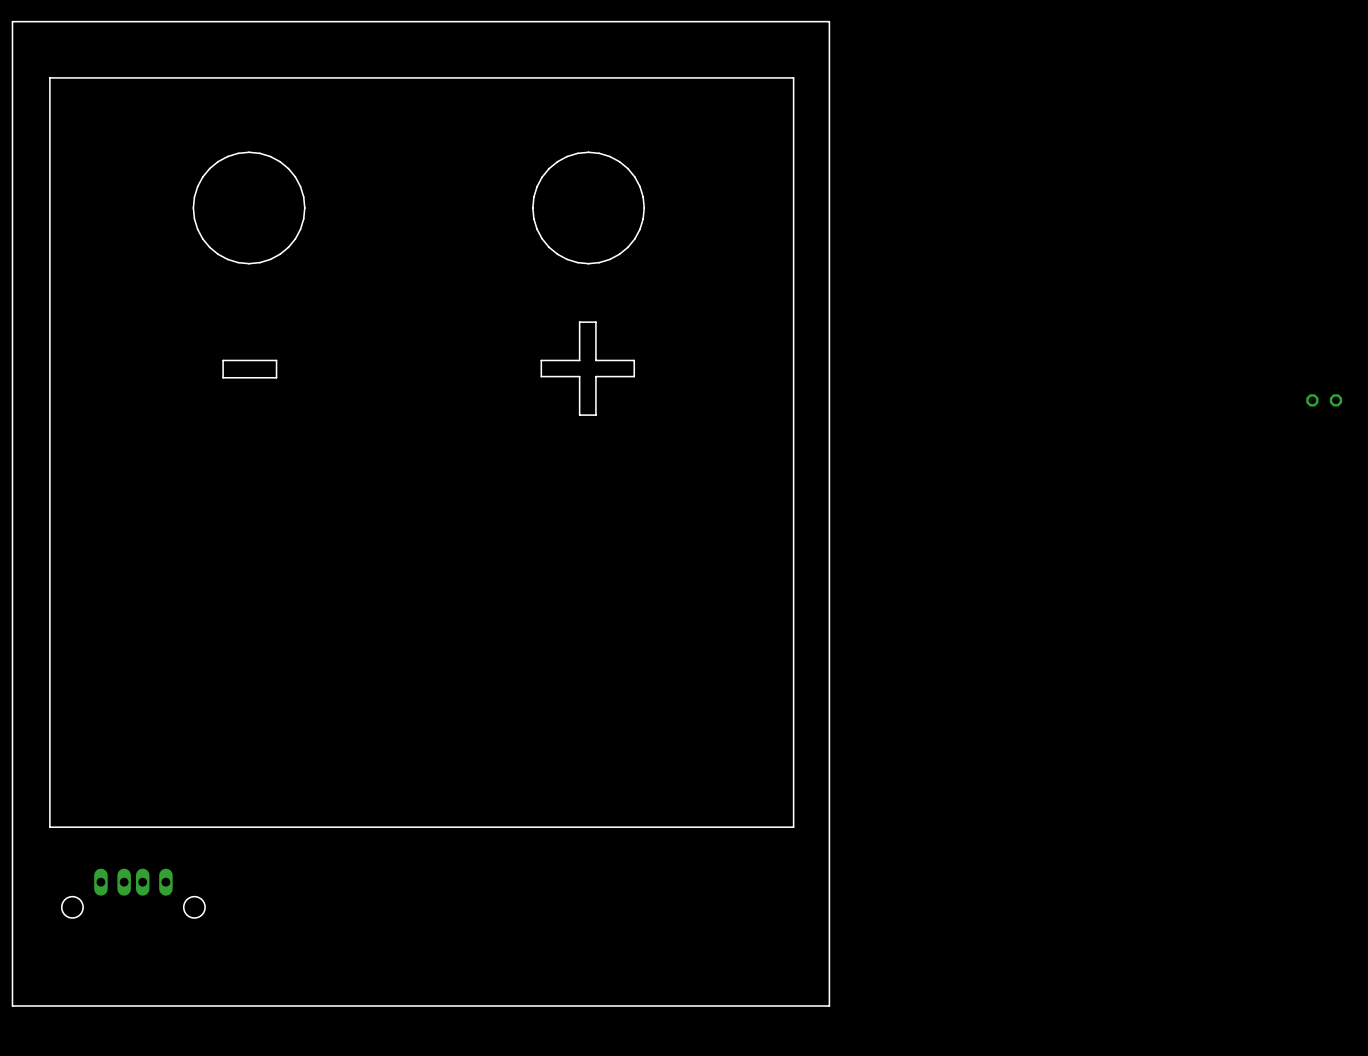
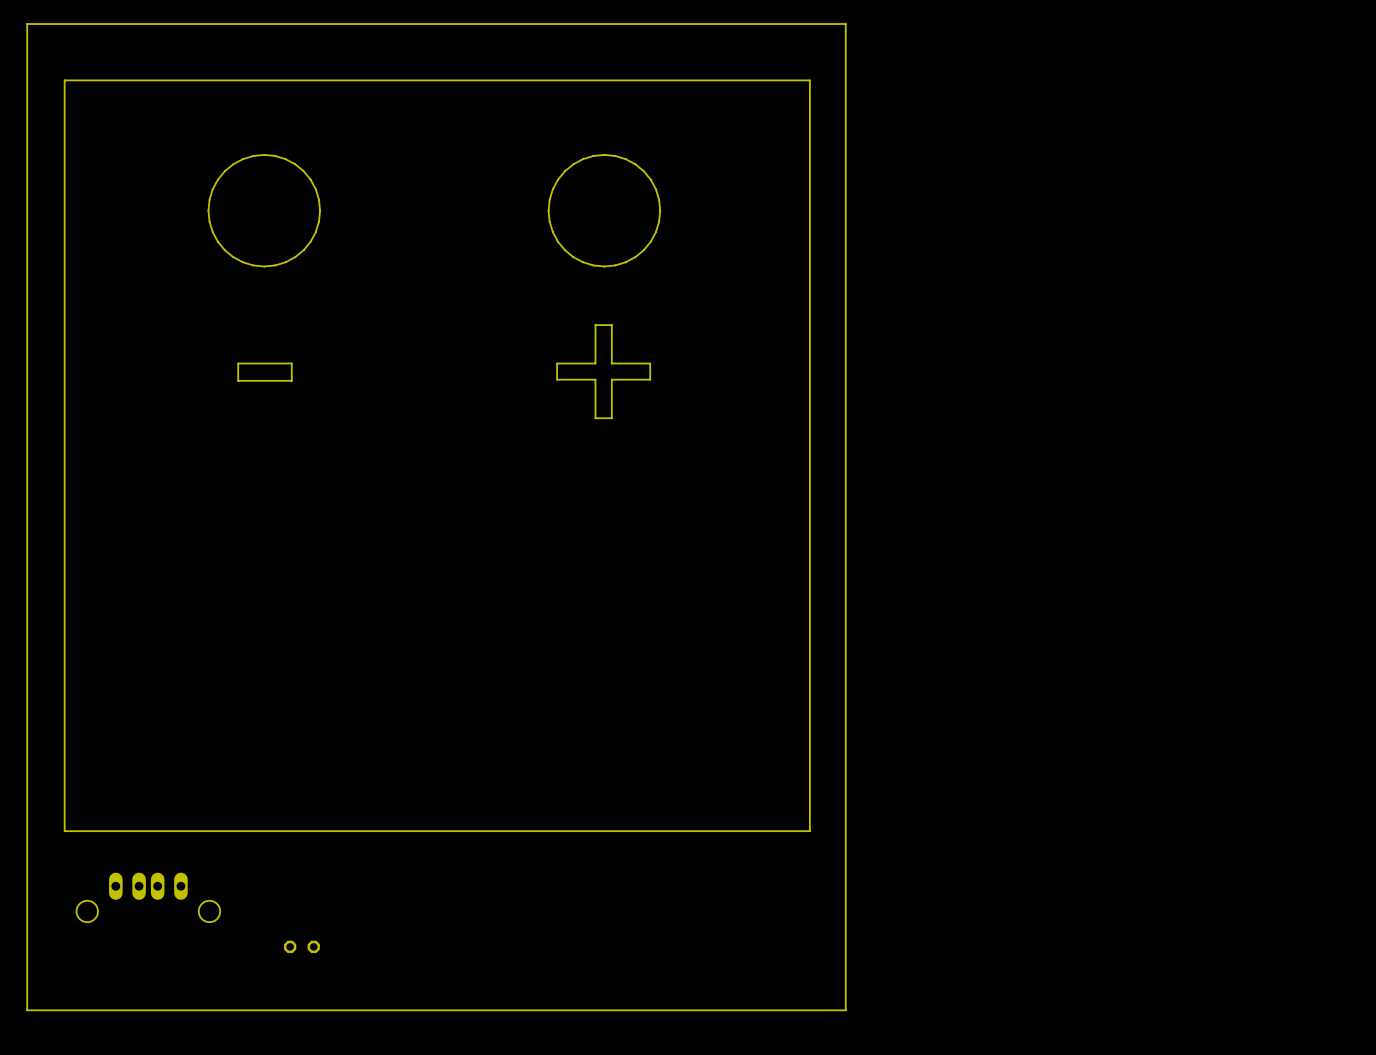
part: (1324, 400) -> none
part: none -> (301, 946)

